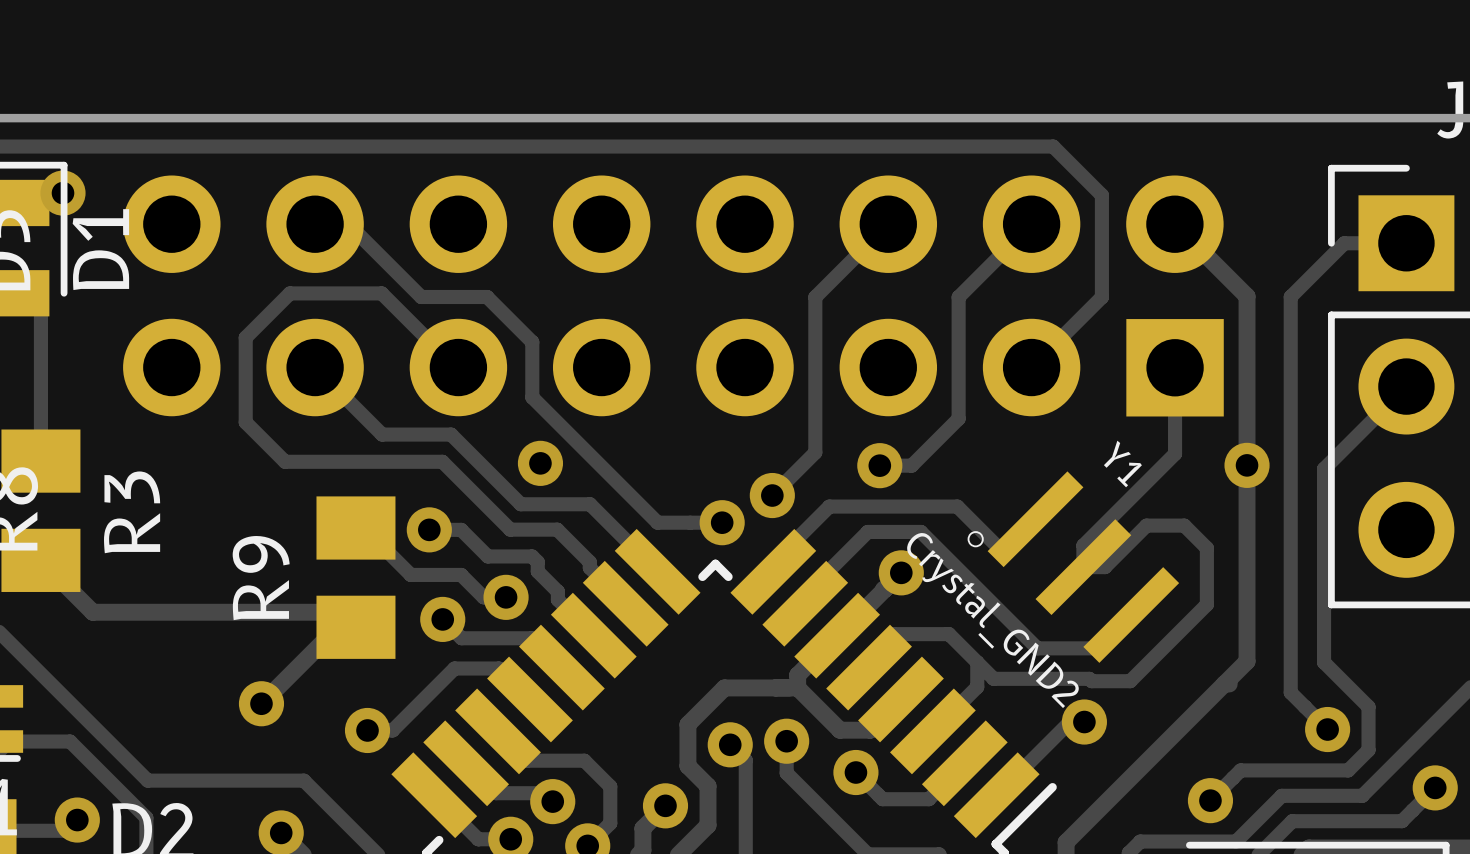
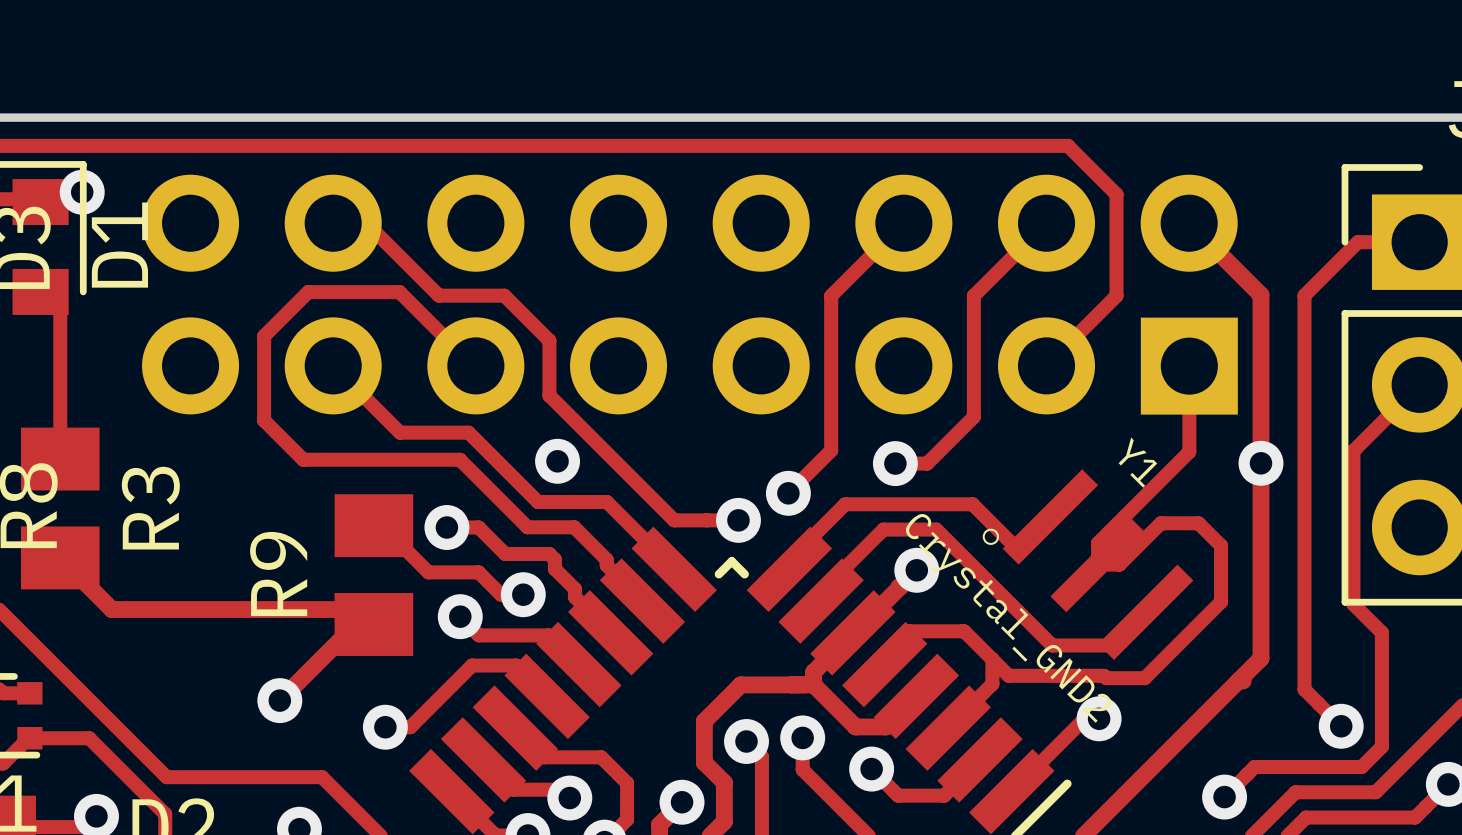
track: (1339, 453) (1324, 468) (1324, 662) (1368, 706) -> (1353, 451) (1353, 604) (1381, 632) (1381, 703)

